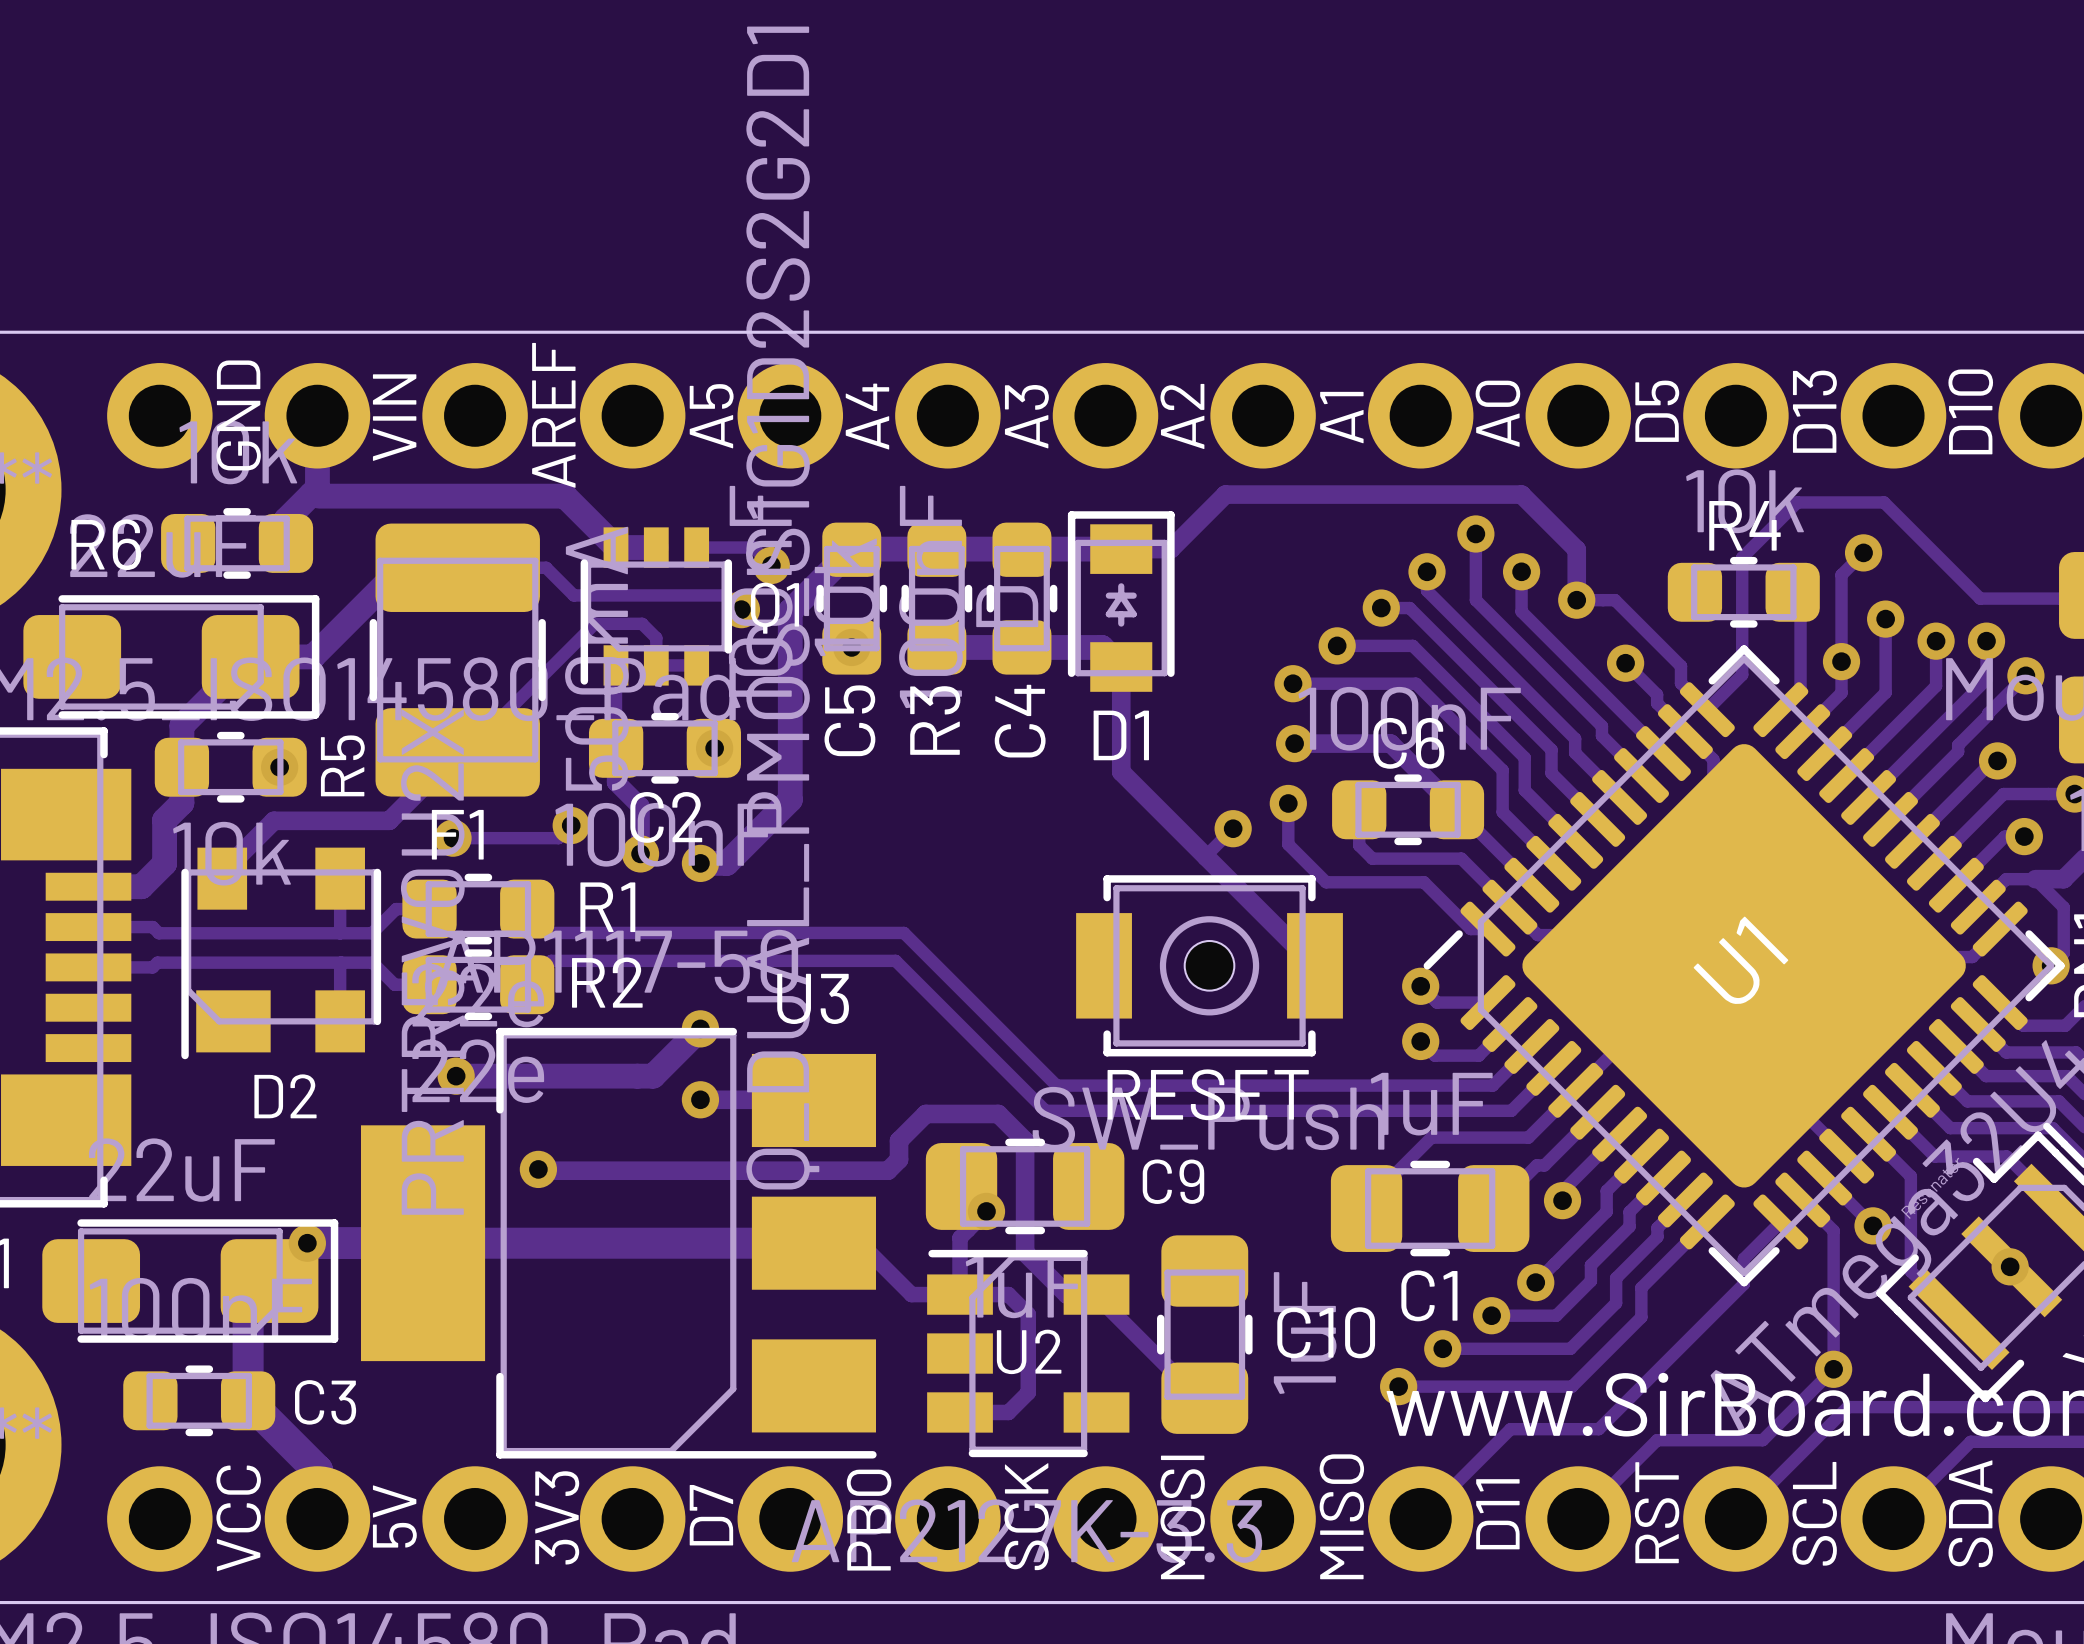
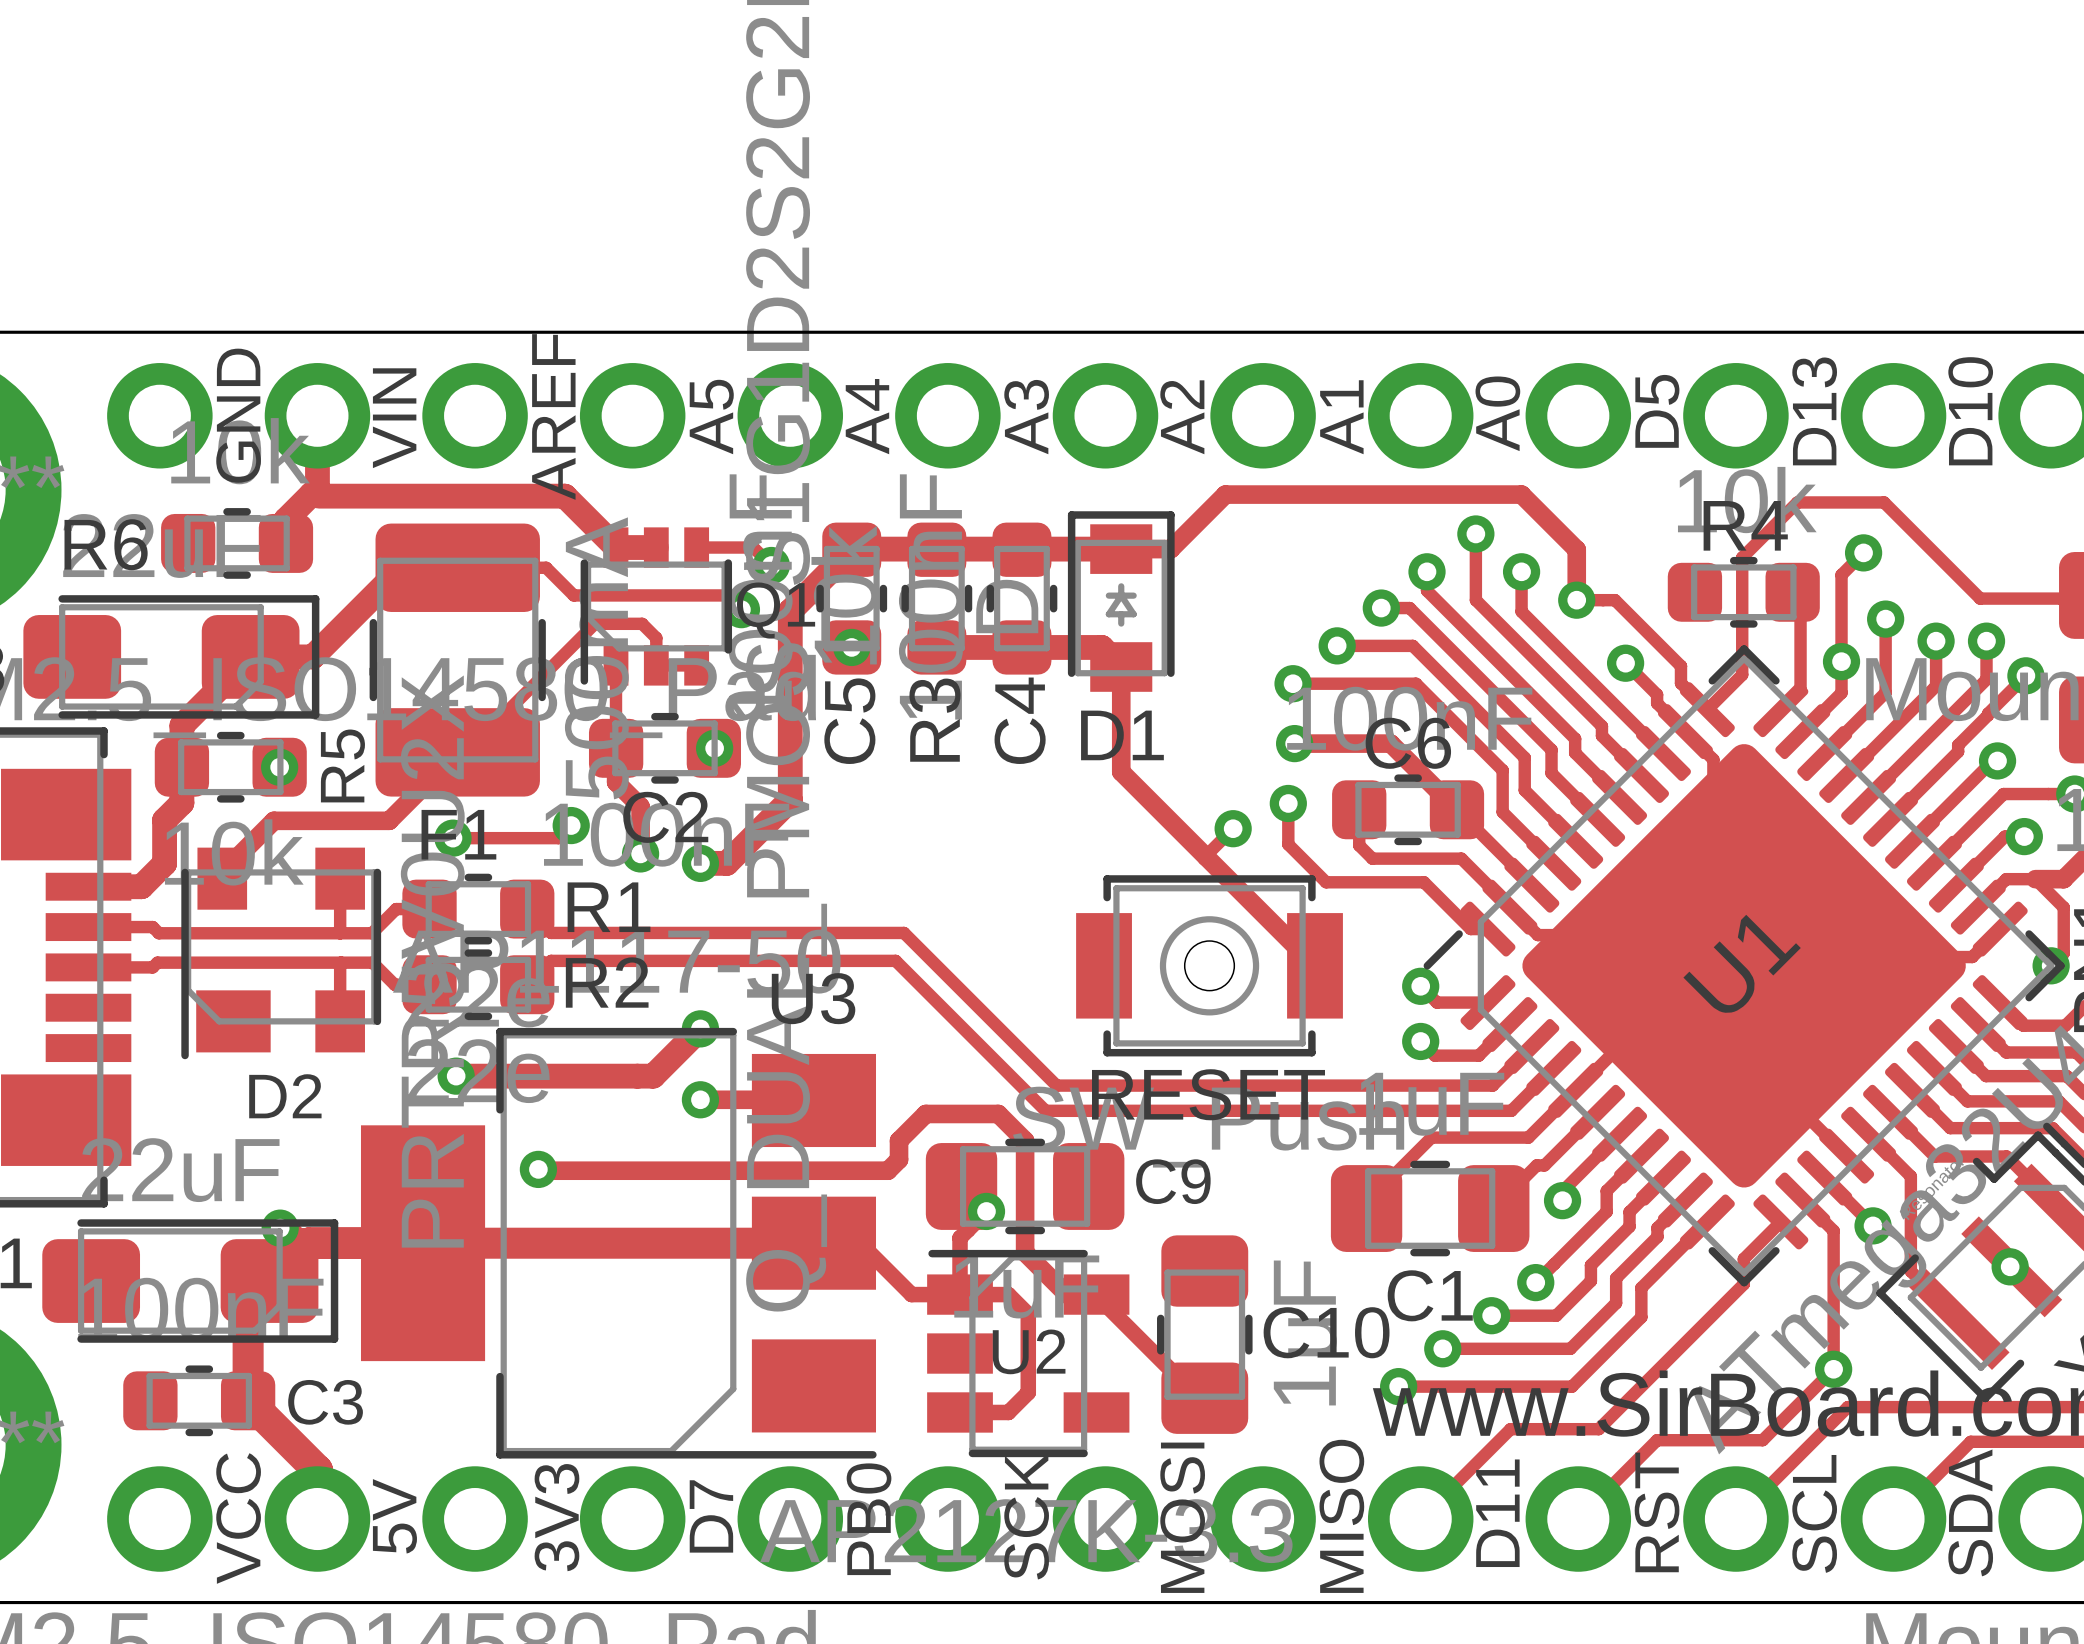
via position: (307, 1243) -> (280, 1228)

